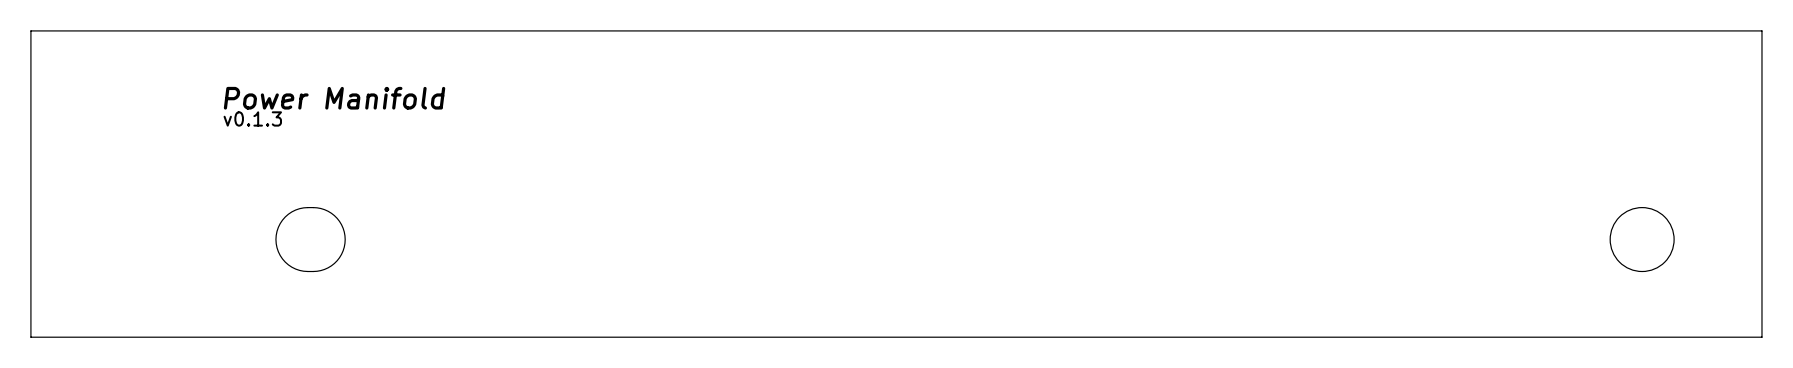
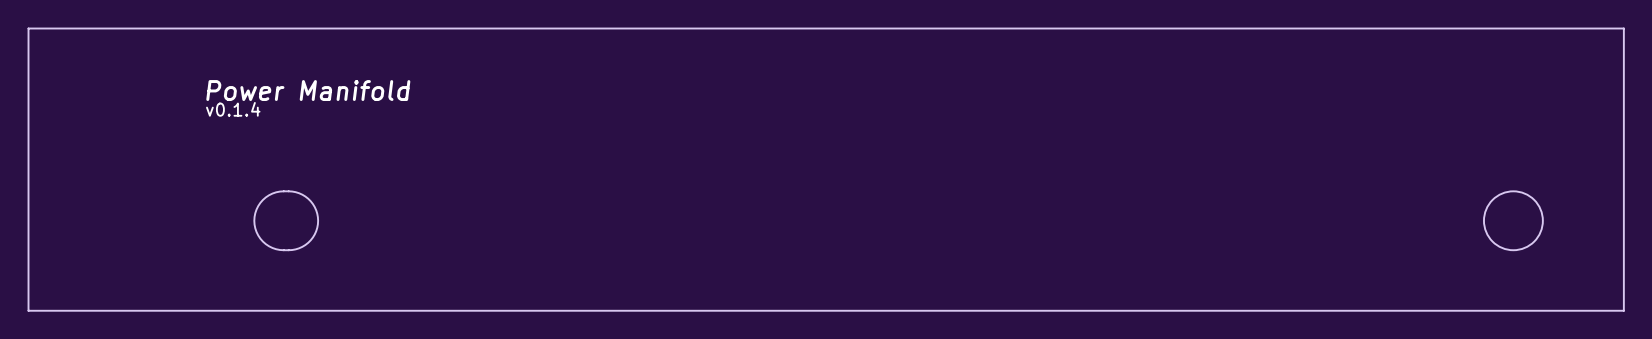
text: v0.1.3 (252, 118) -> v0.1.4 (233, 109)

